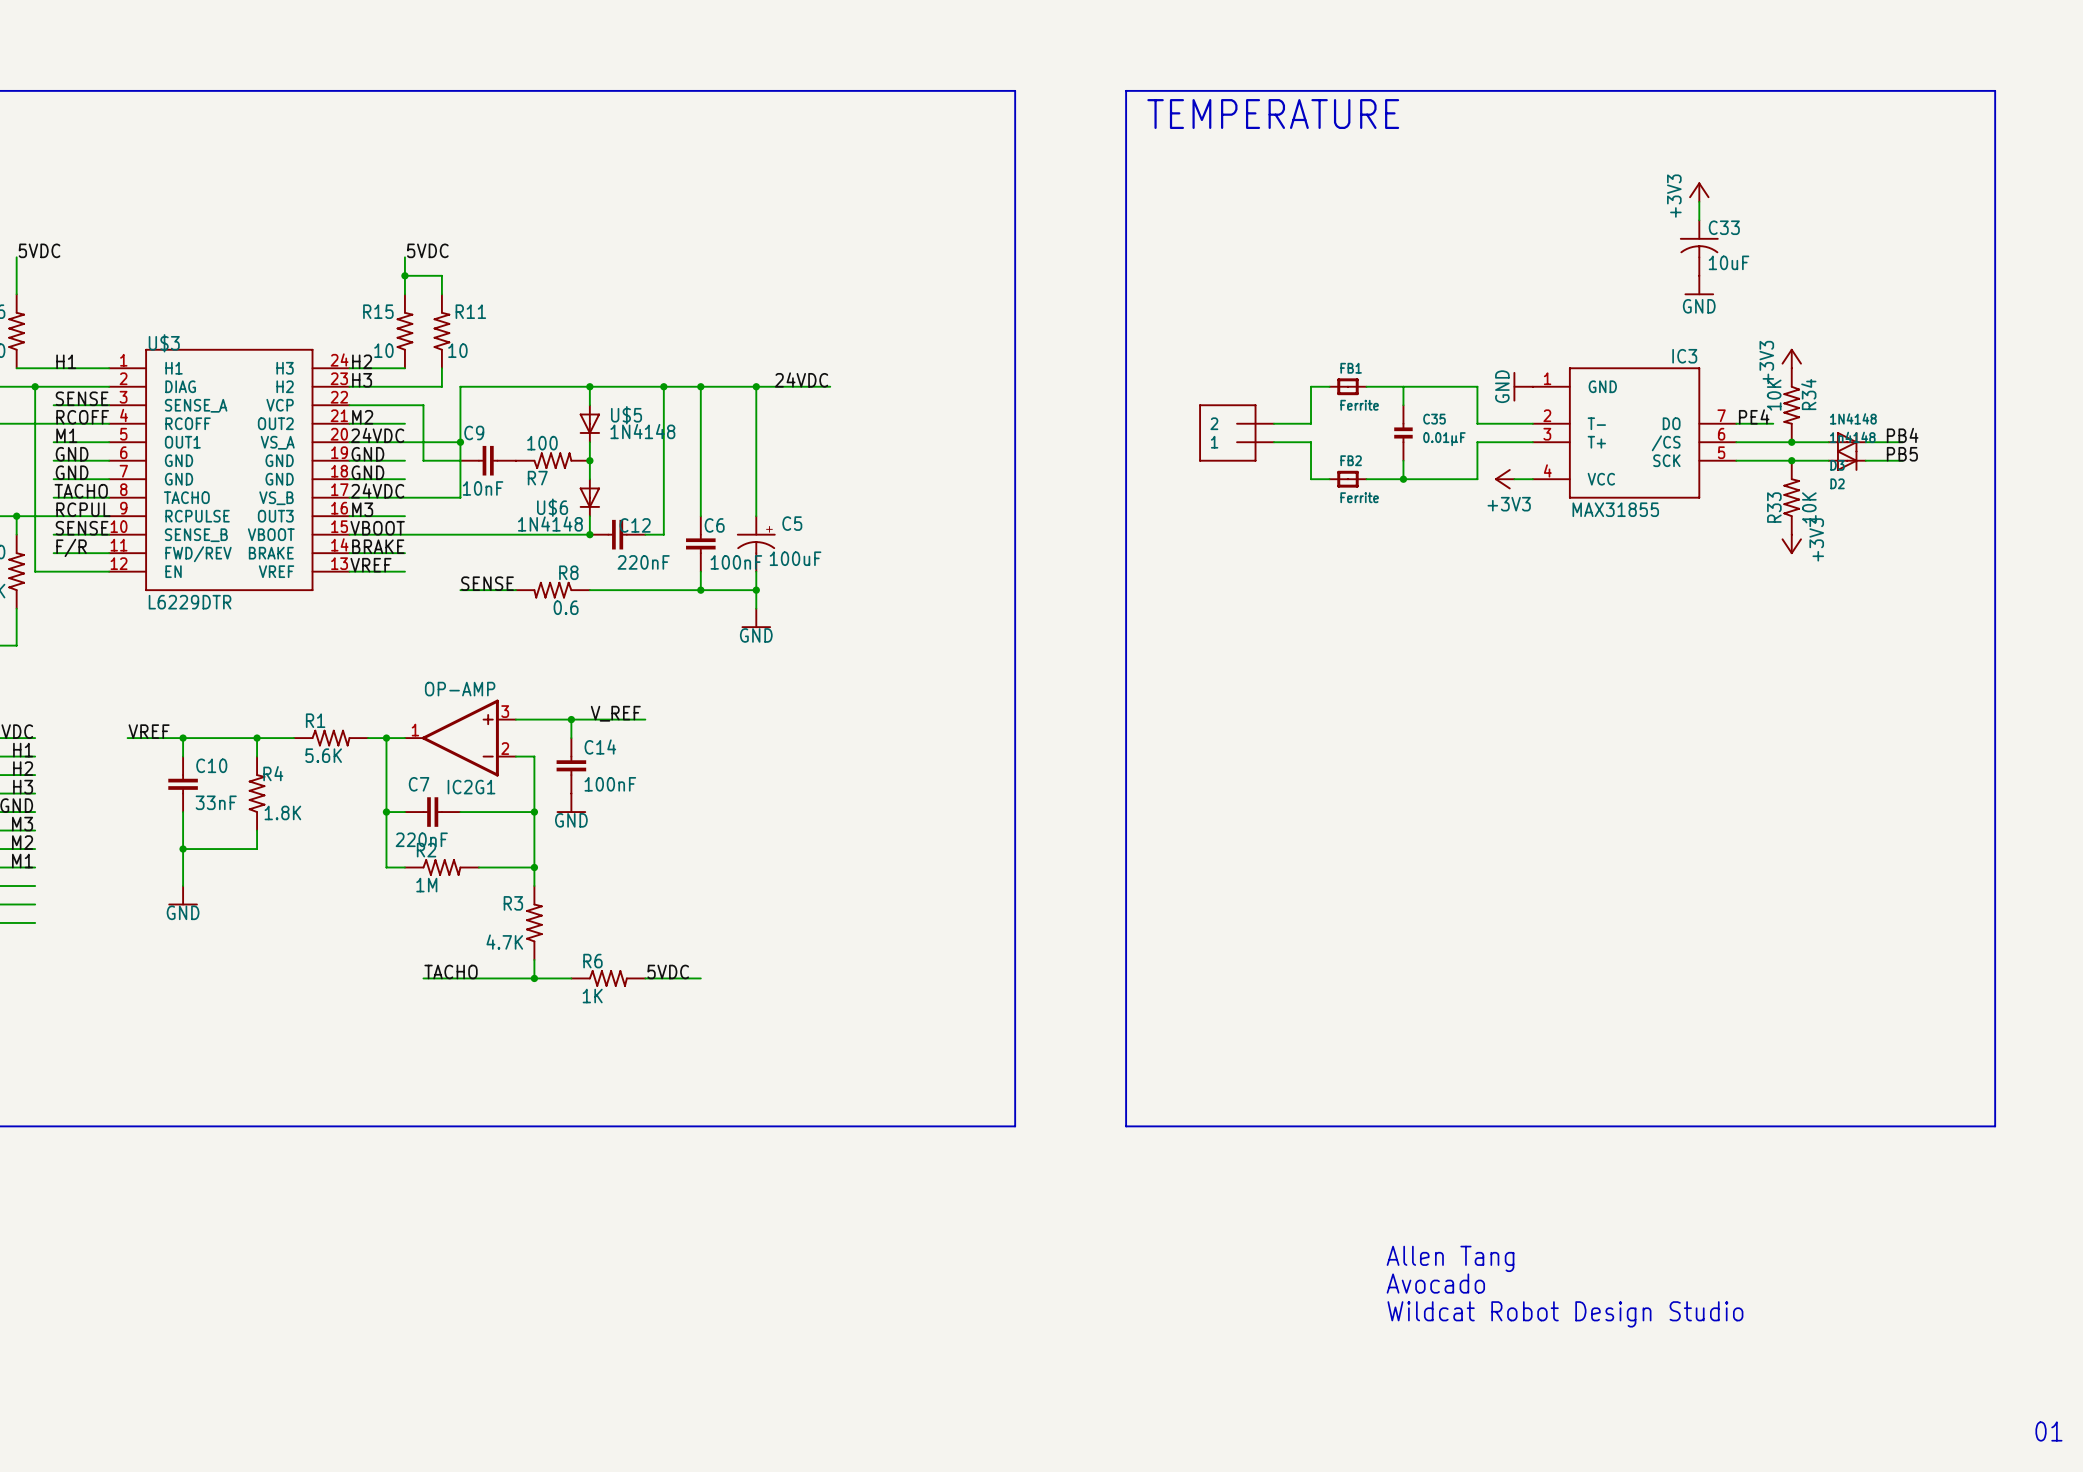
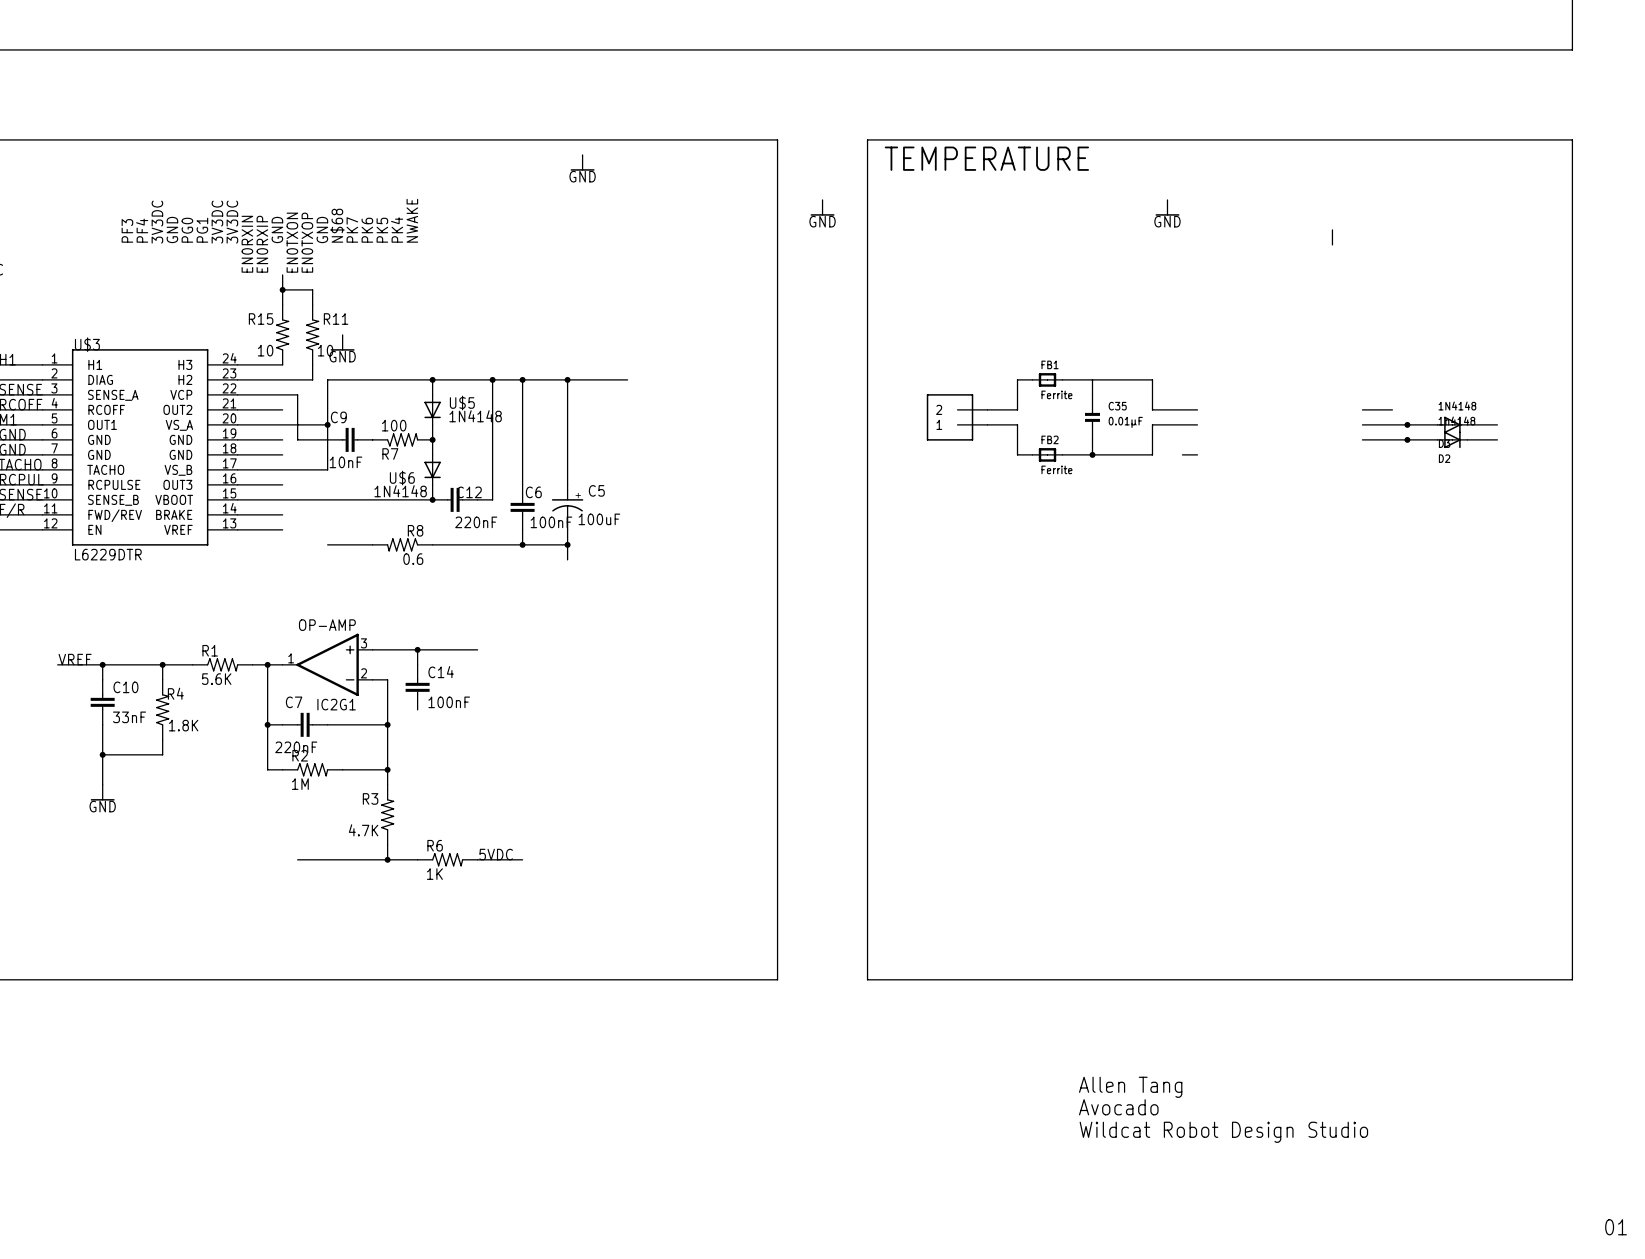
power symbol: none -> GND (582, 162)
power symbol: none -> GND (822, 207)
power symbol: none -> GND (1167, 207)
label: none -> NWAKE (412, 220)
label: none -> 3V3DC (157, 222)
label: none -> 3V3DC (217, 222)
label: none -> 3V3DC (232, 222)
power symbol: +3V3 (1699, 192) -> none
label: none -> N$68 (337, 225)
label: none -> GND (172, 229)
label: none -> GND (277, 229)
label: none -> GND (322, 229)
label: none -> PK7 (352, 229)
label: none -> PK4 (397, 229)
label: none -> PF4 (142, 230)
label: none -> PG0 (187, 230)
label: none -> PG1 (202, 230)
label: none -> PK6 (367, 230)
label: none -> PK5 (382, 230)
label: none -> PF3 (127, 230)
label: none -> EN0TXON (292, 242)
label: none -> EN0TXOP (307, 242)
label: none -> EN0RXIN (247, 244)
label: none -> EN0RXIP (262, 244)
C33: 10uF (1699, 248) -> none
label: 5VDC (427, 250) -> none
power symbol: GND (1699, 285) -> none
power symbol: none -> GND (342, 342)
power symbol: +3V3 (1791, 358) -> none
label: H2 (362, 361) -> none
label: 24VDC (801, 379) -> none
label: H3 (362, 380) -> none
power symbol: GND (1523, 386) -> none
R34: 10K (1791, 405) -> none
label: PE4 (1754, 416) -> none
label: M2 (362, 417) -> none
IC3: MAX31855 (1634, 432) -> none
label: 24VDC (377, 435) -> none
label: PB4 (1902, 435) -> none
label: GND (367, 454) -> none
label: PB5 (1902, 454) -> none
label: GND (367, 472) -> none
power symbol: +3V3 (1504, 479) -> none
label: 24VDC (377, 490) -> none
R33: 10K (1791, 497) -> none
label: M3 (362, 509) -> none
label: VBOOT (377, 528) -> none
power symbol: +3V3 (1791, 544) -> none
label: BRAKE (378, 546) -> none
label: VREF (370, 565) -> none
label: SENSE (487, 583) -> none
power symbol: GND (756, 618) -> none
label: V_REF (615, 713) -> none
power symbol: GND (571, 803) -> none
label: TACHO (451, 971) -> none

